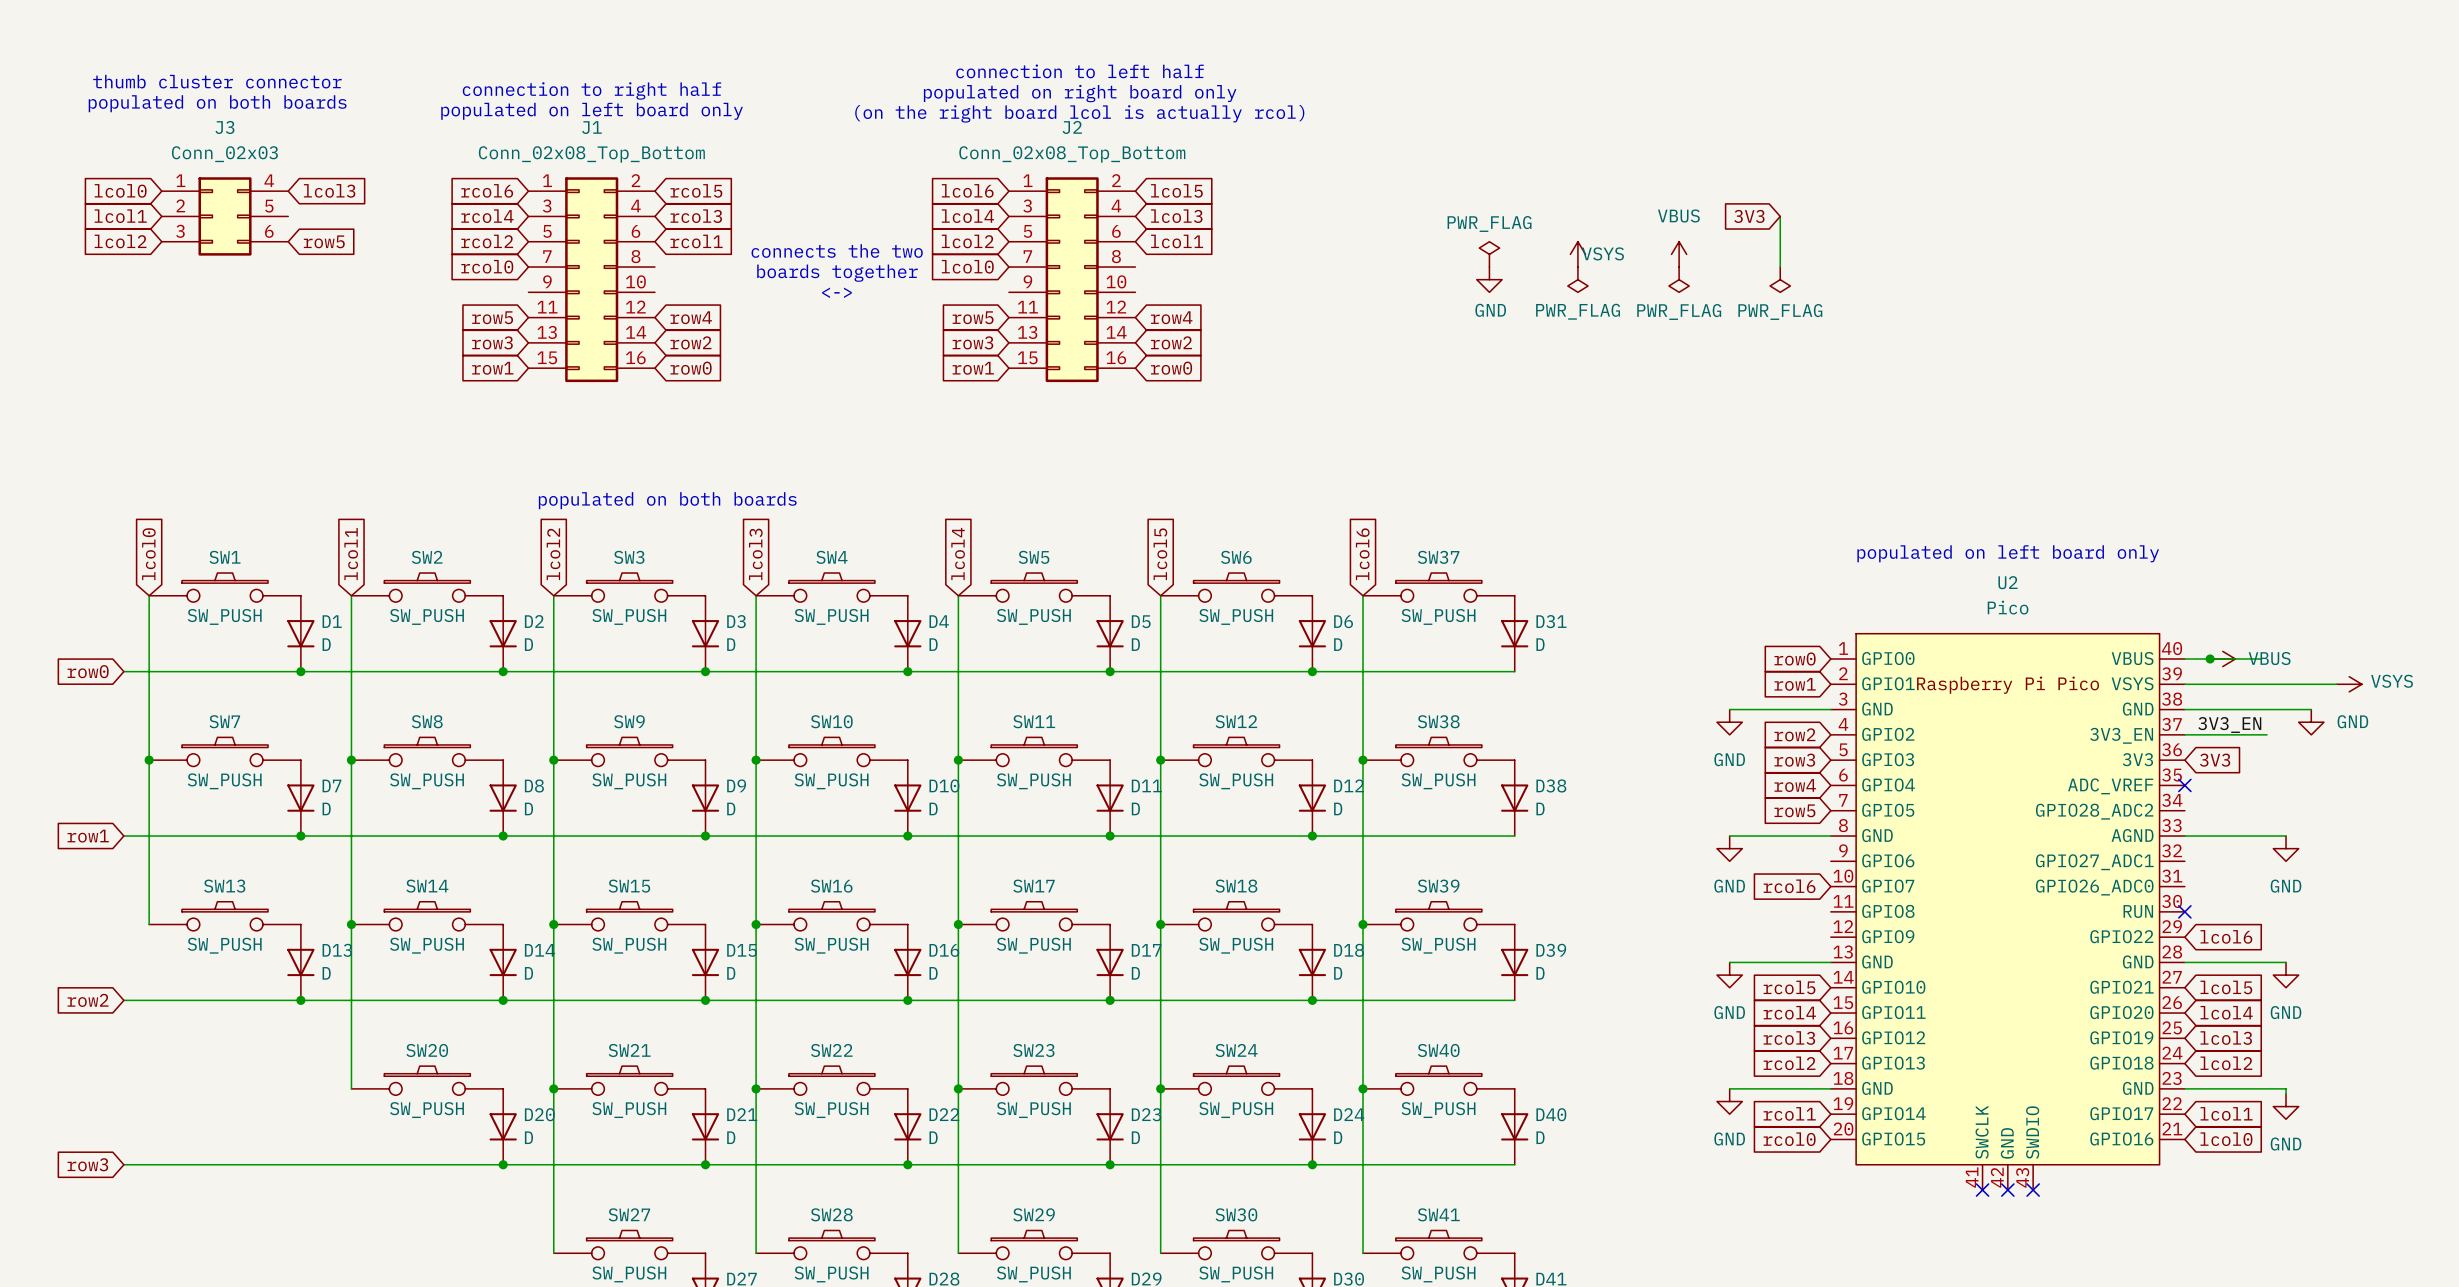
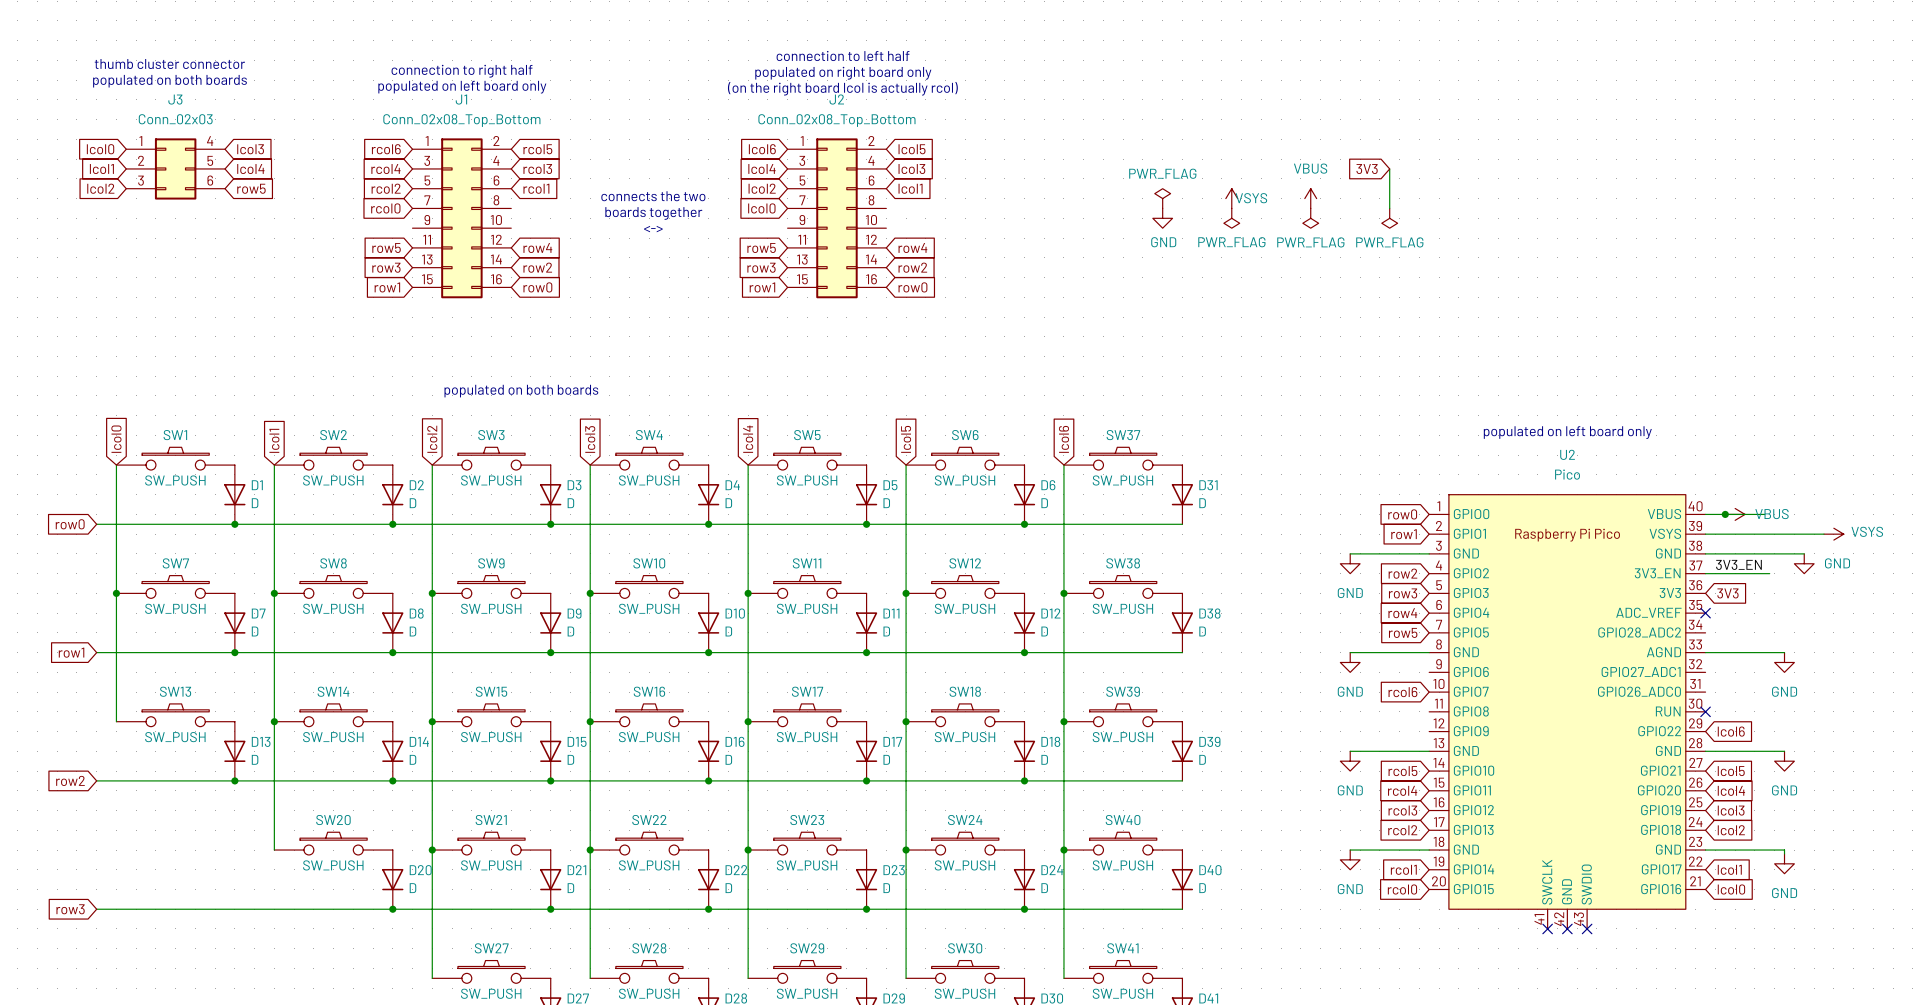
global label: none -> lcol4 (250, 169)

